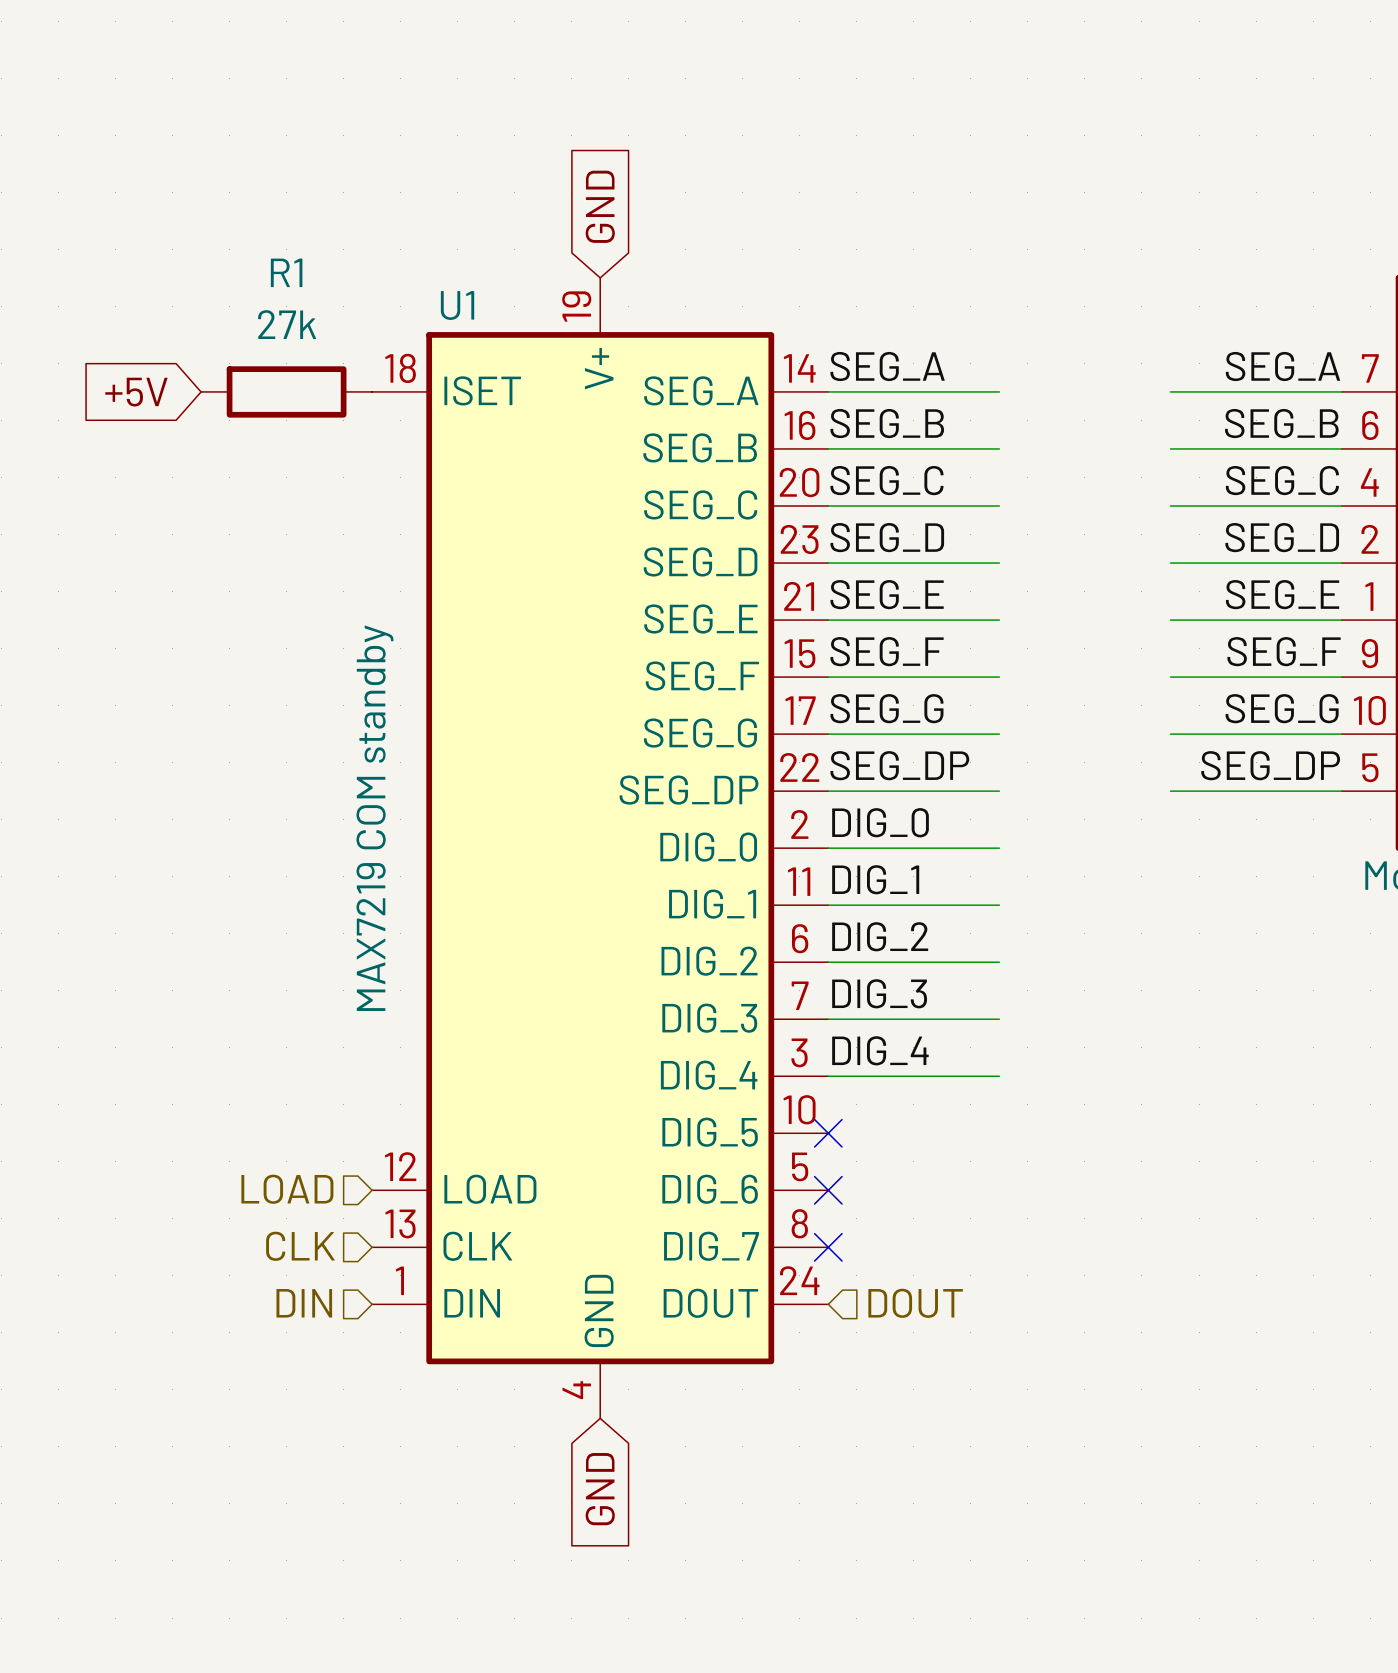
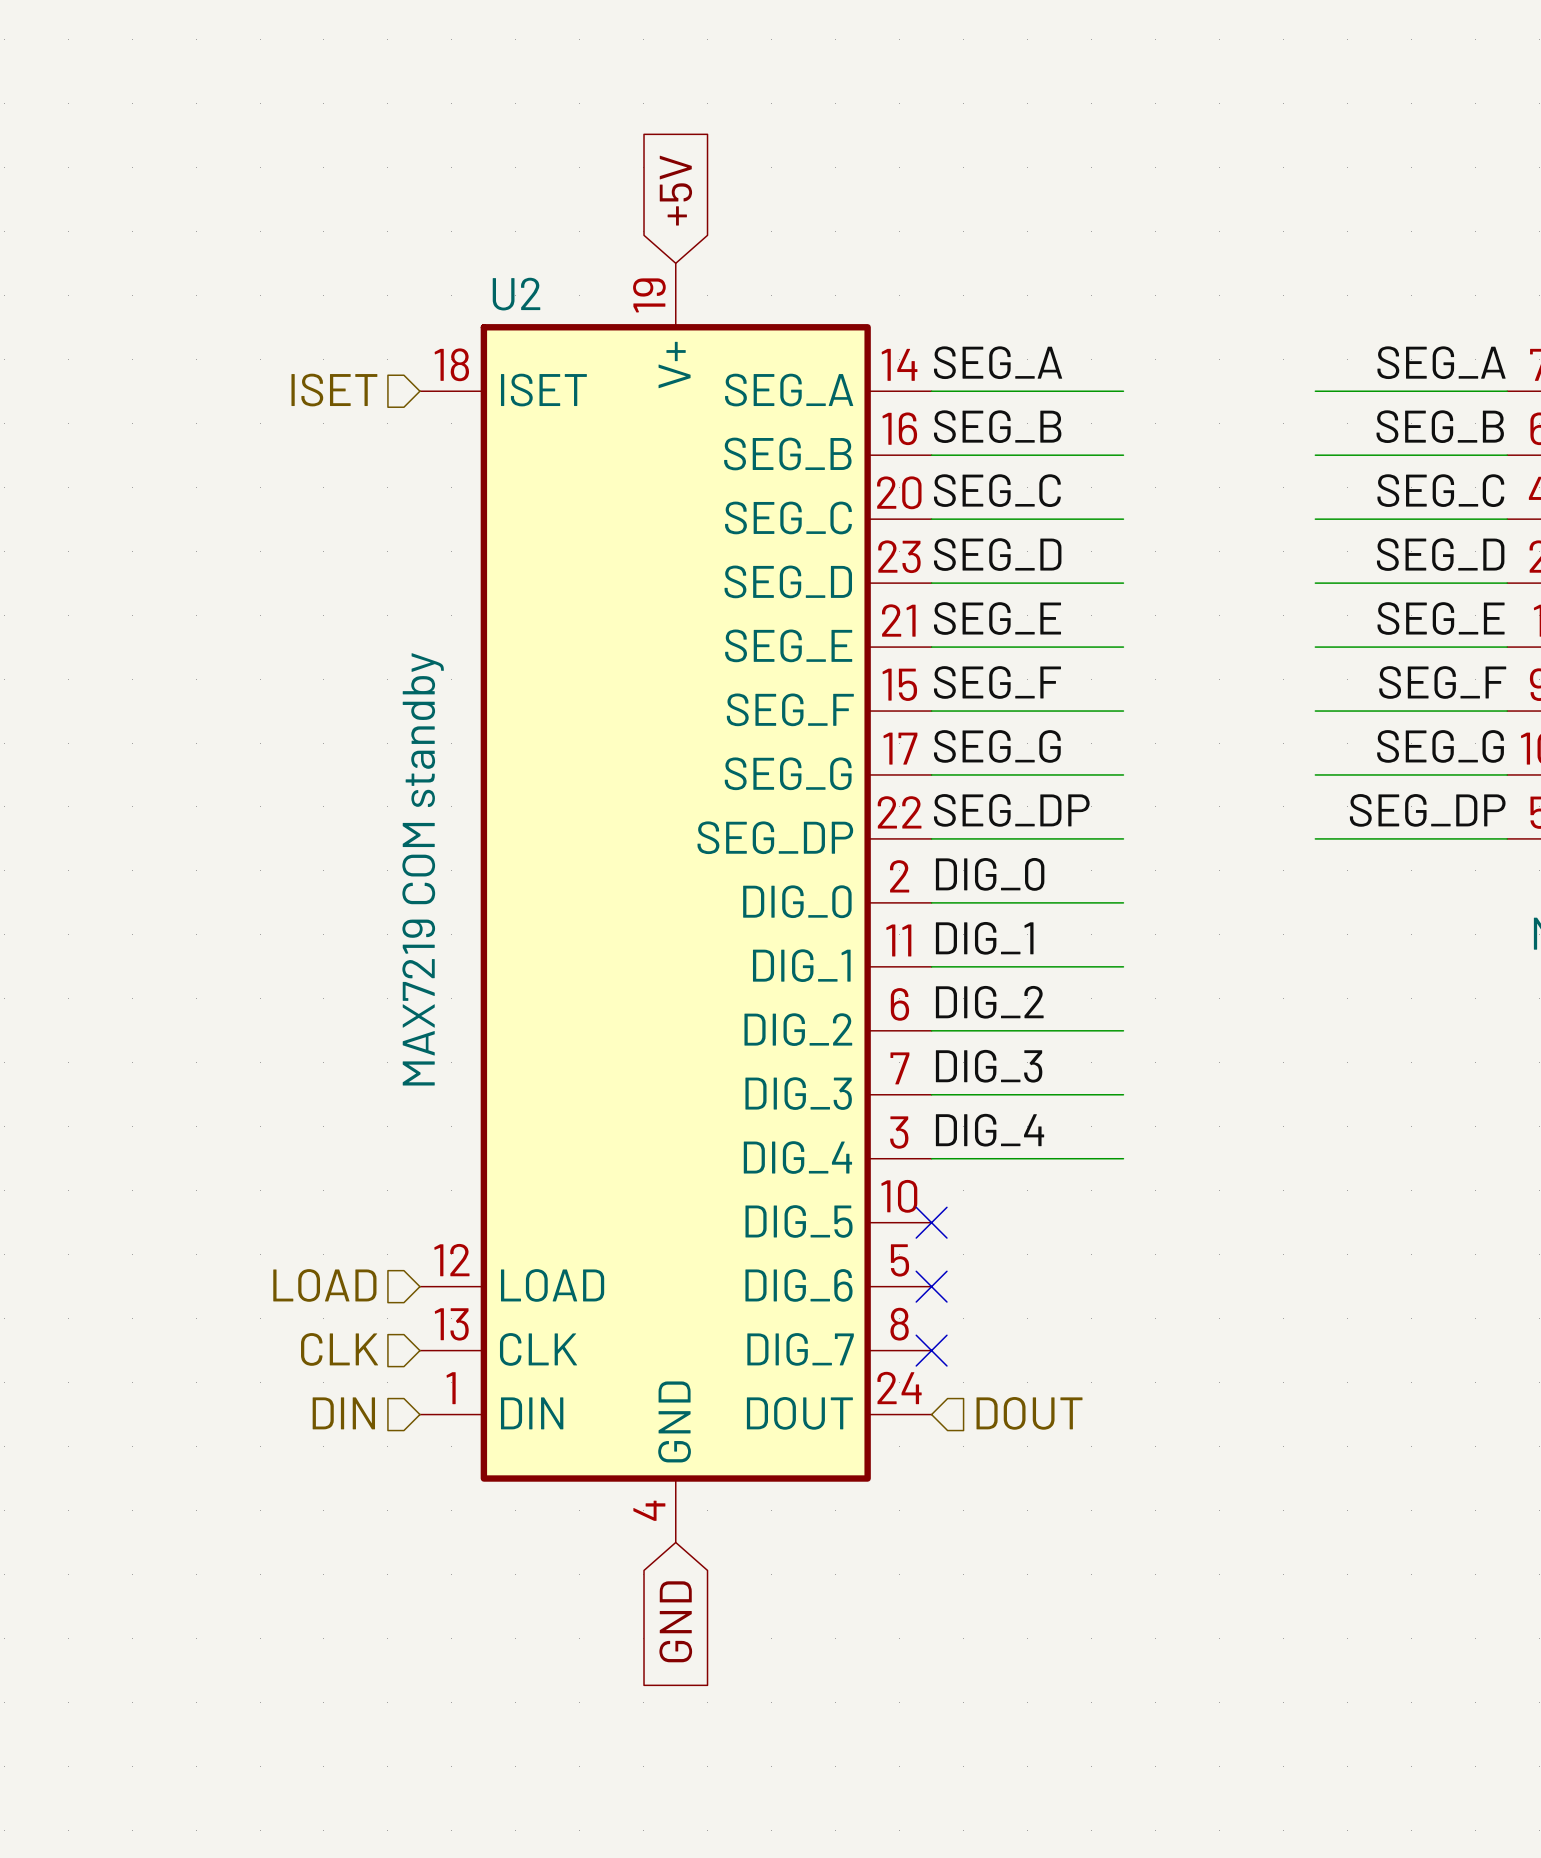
global label: GND (600, 206) -> +5V (675, 190)
U1 name: U1 (457, 305) -> U2 (516, 294)
hierarchical label: none -> ISET (334, 390)
R1: 27k (286, 391) -> none
global label: +5V (136, 392) -> none

